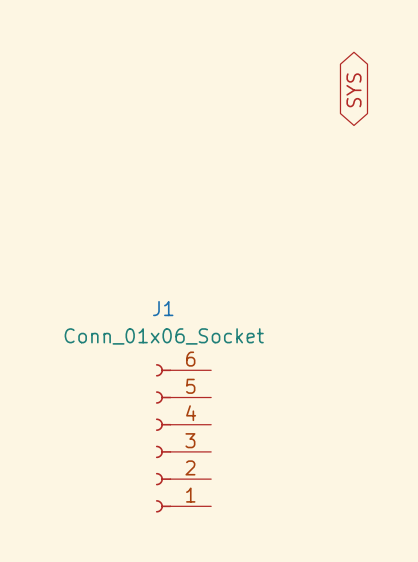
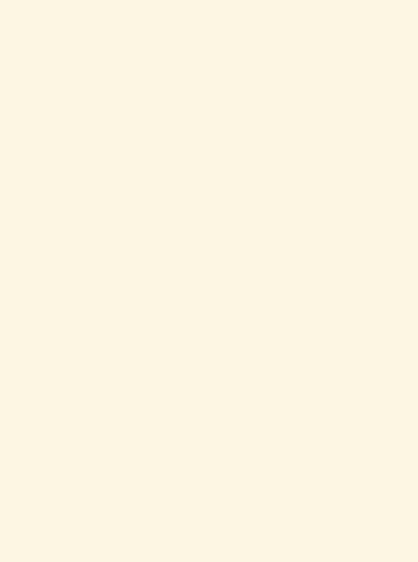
global label: SYS (353, 90) -> none
J1: Conn_01x06_Socket (183, 438) -> none

